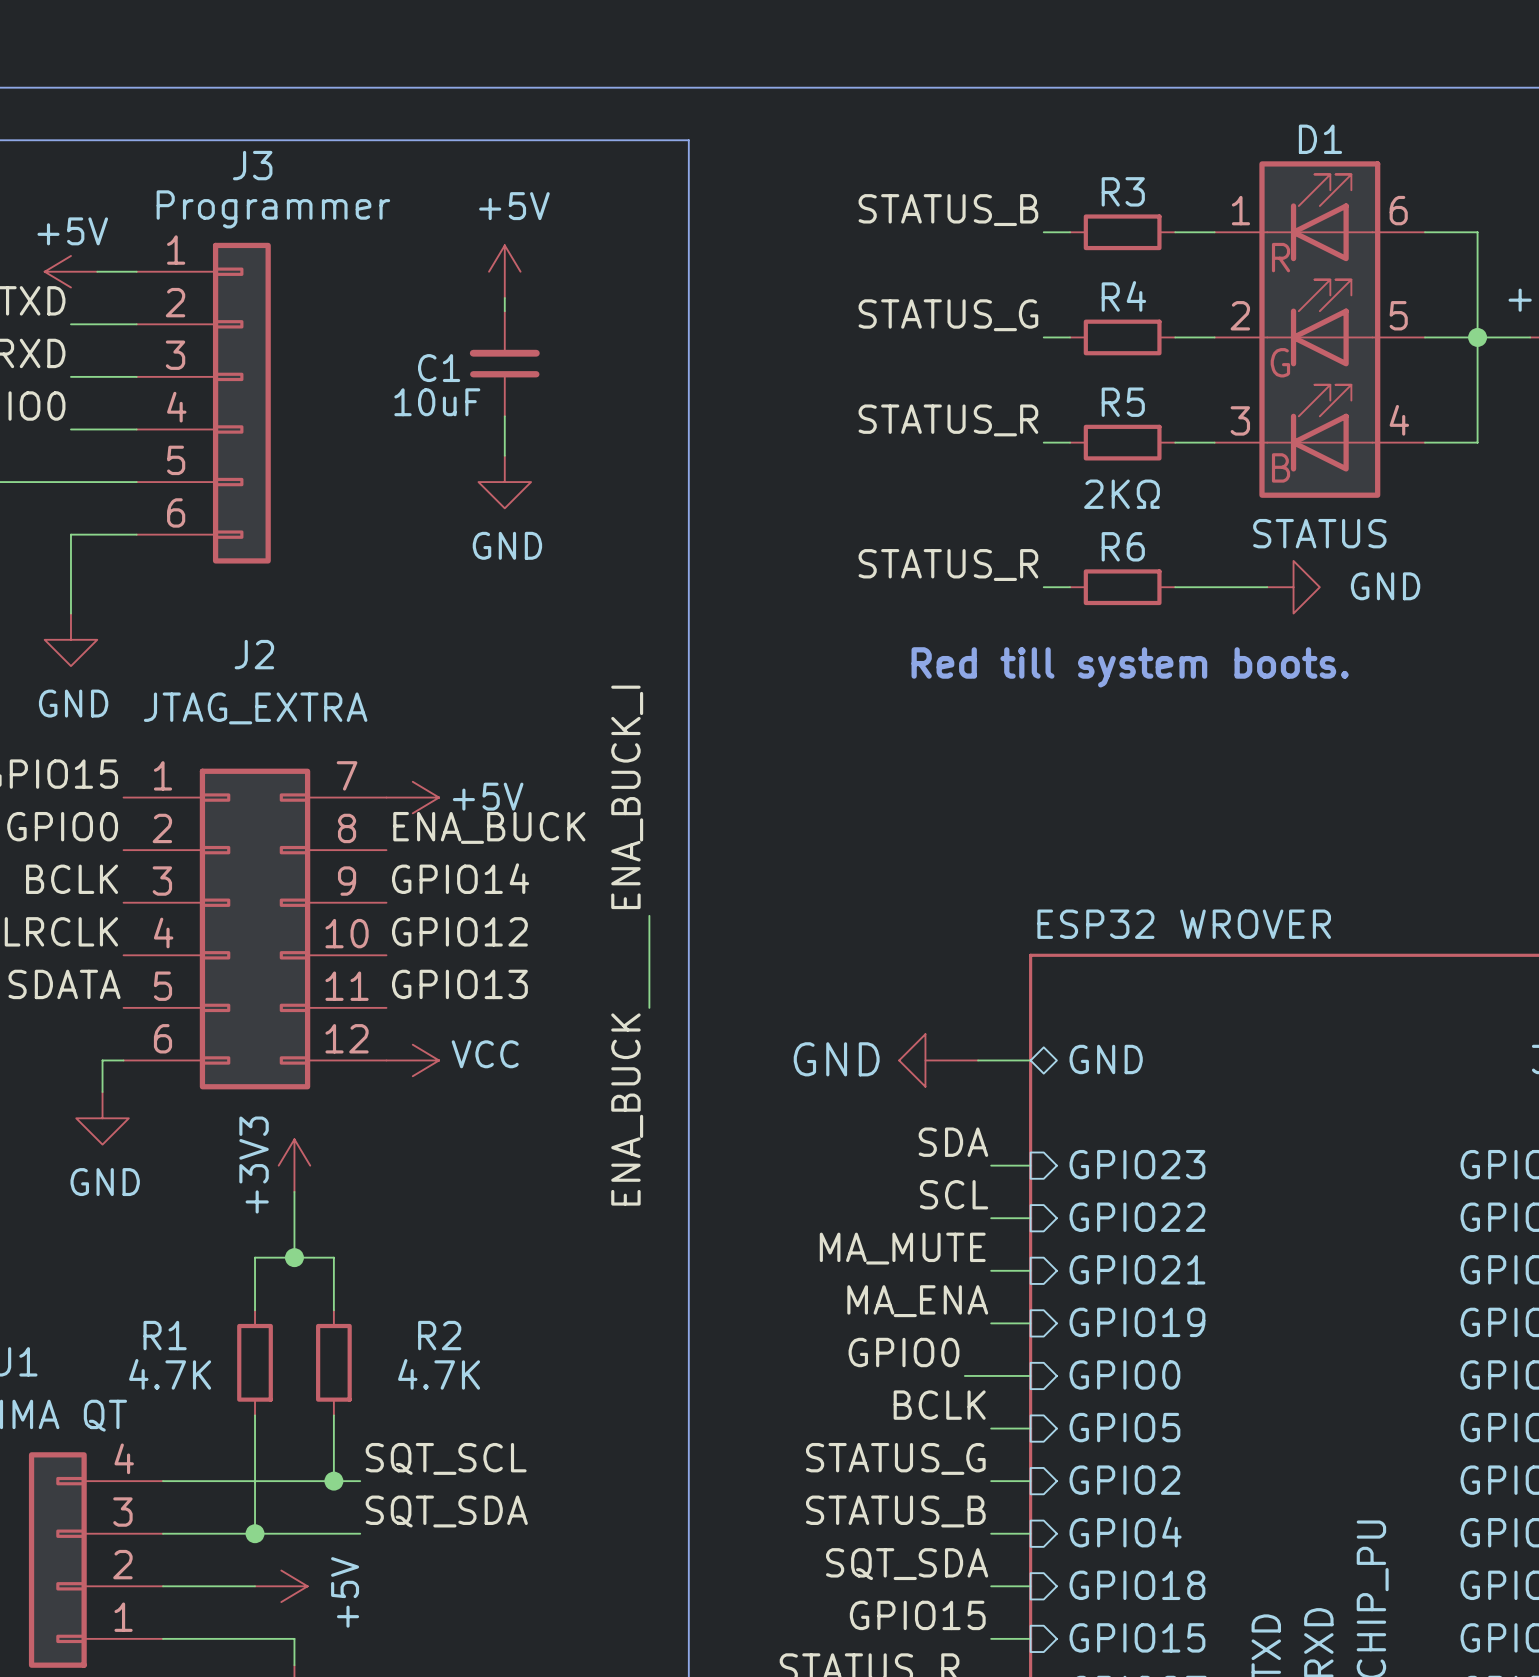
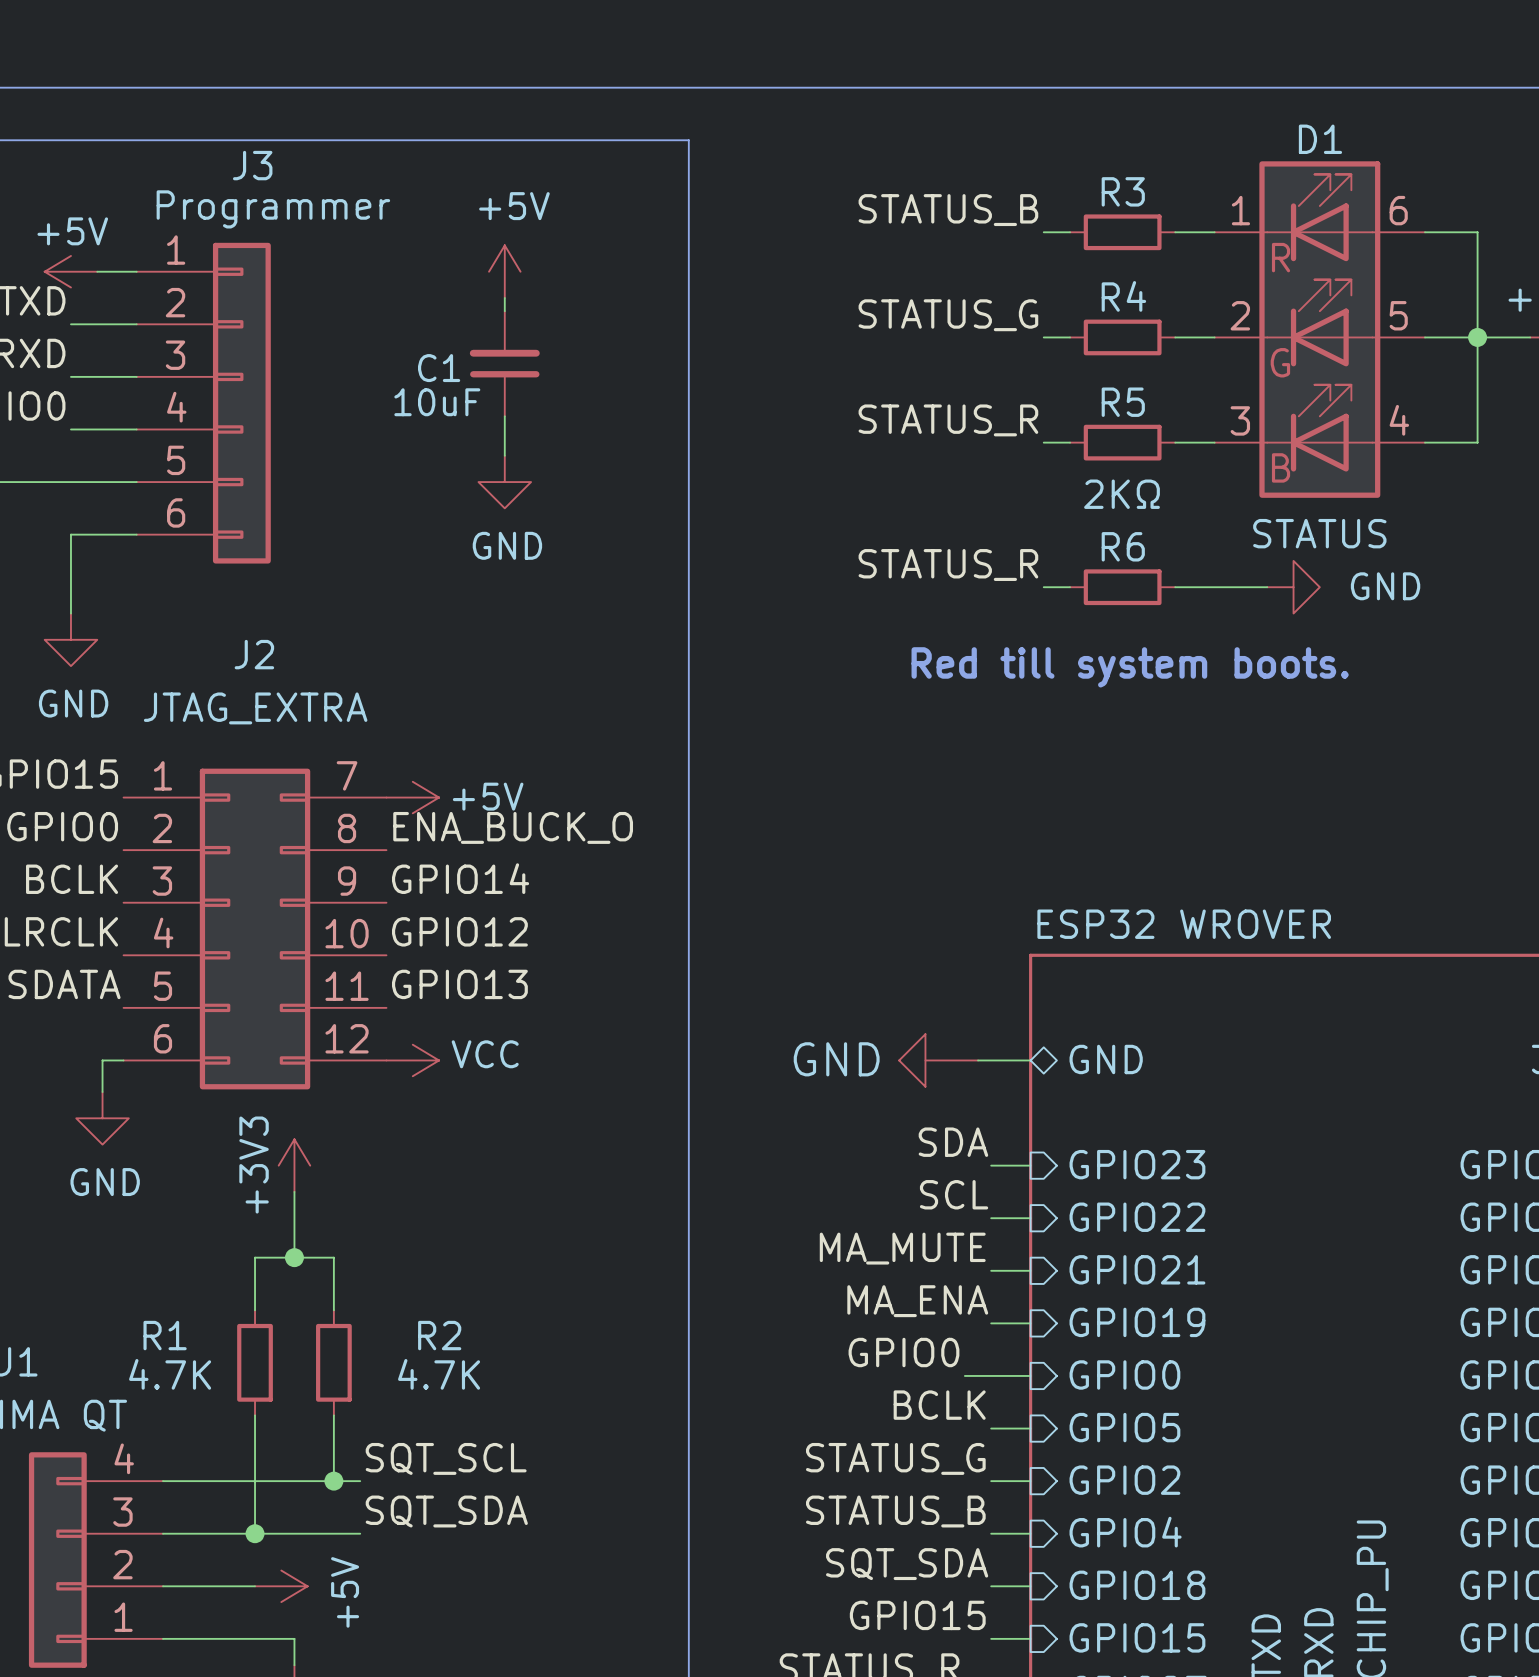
label: ENA_BUCK_I (627, 797) -> none
label: ENA_BUCK (489, 827) -> ENA_BUCK_O (513, 827)
wire: (649, 915) (649, 1007) -> none
label: ENA_BUCK (627, 1109) -> none

